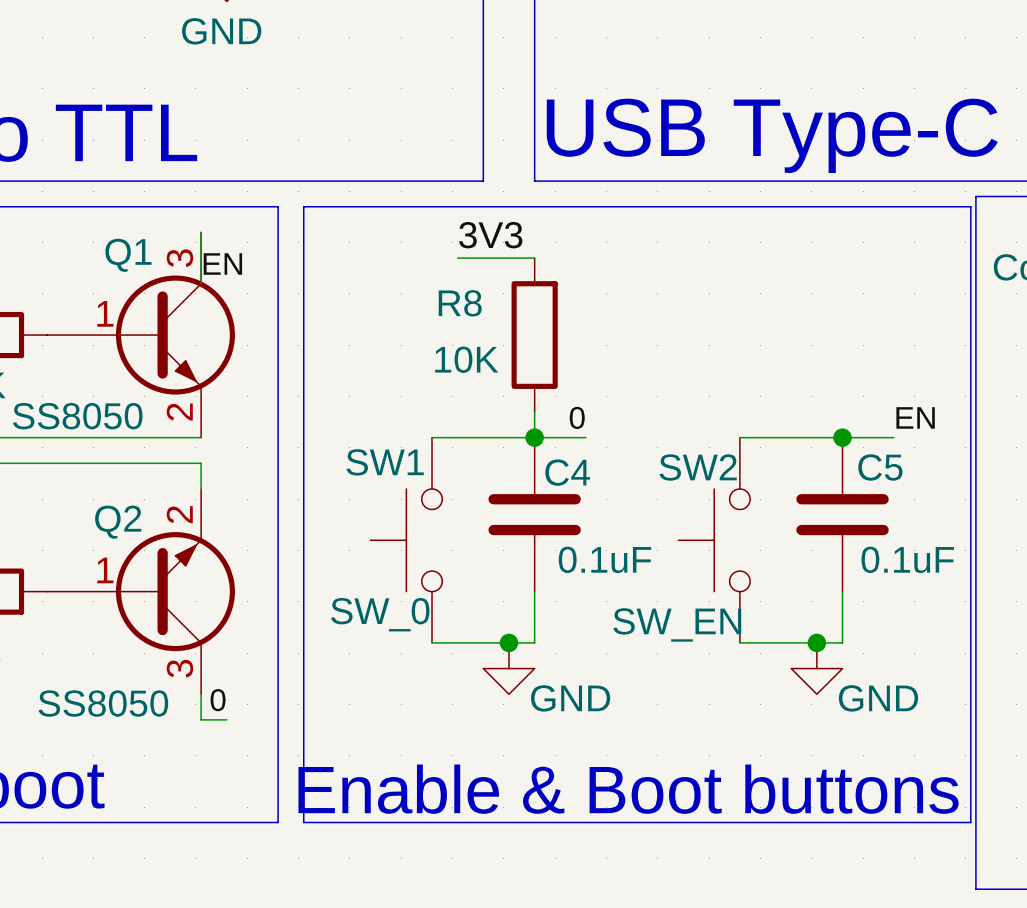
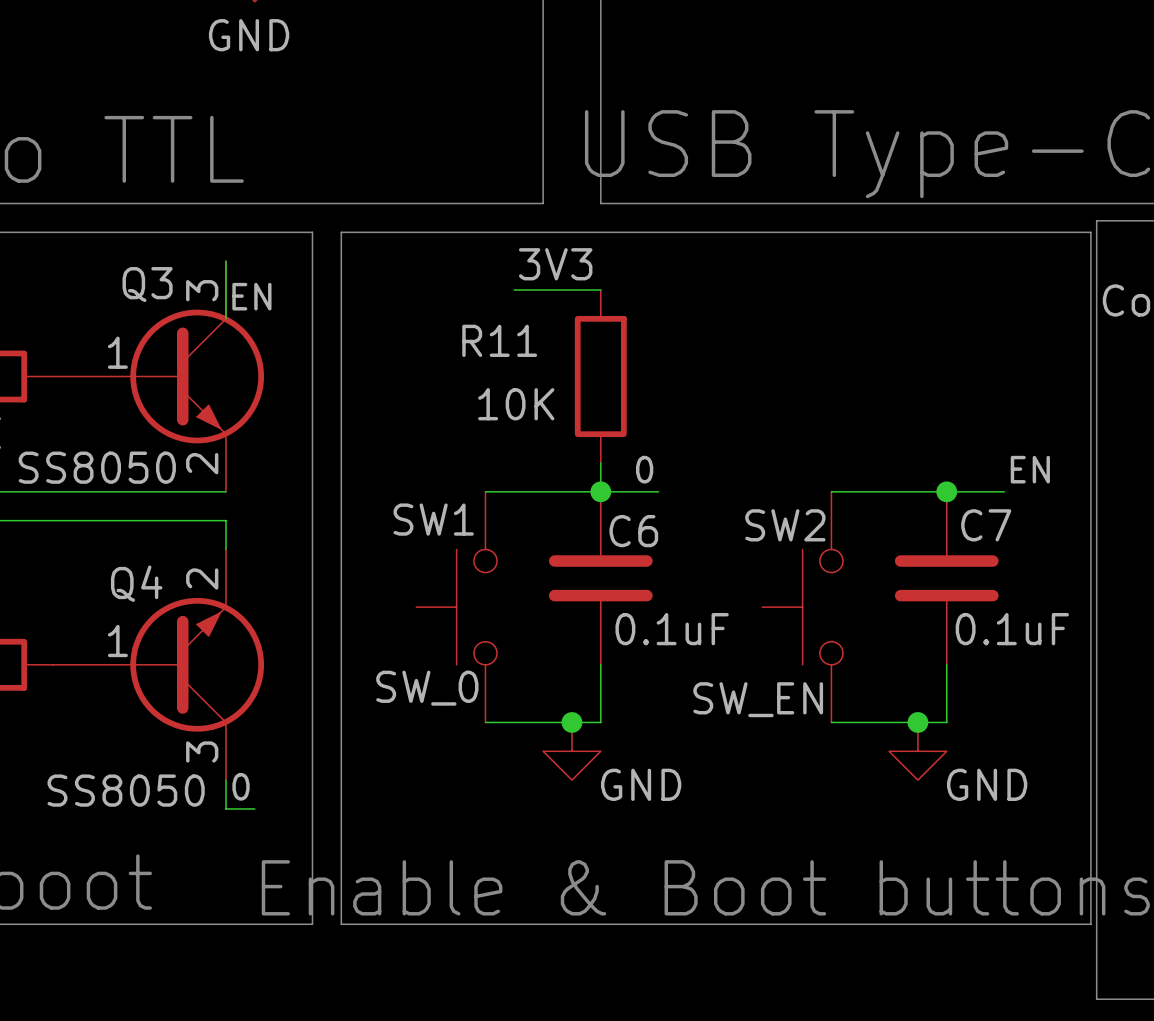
Q1 name: Q1 (128, 255) -> Q3 (147, 284)
R8 name: R8 (460, 303) -> R11 (499, 340)
C5 name: C5 (880, 467) -> C7 (986, 525)
C4 name: C4 (567, 472) -> C6 (633, 531)
Q2 name: Q2 (118, 522) -> Q4 (136, 583)

